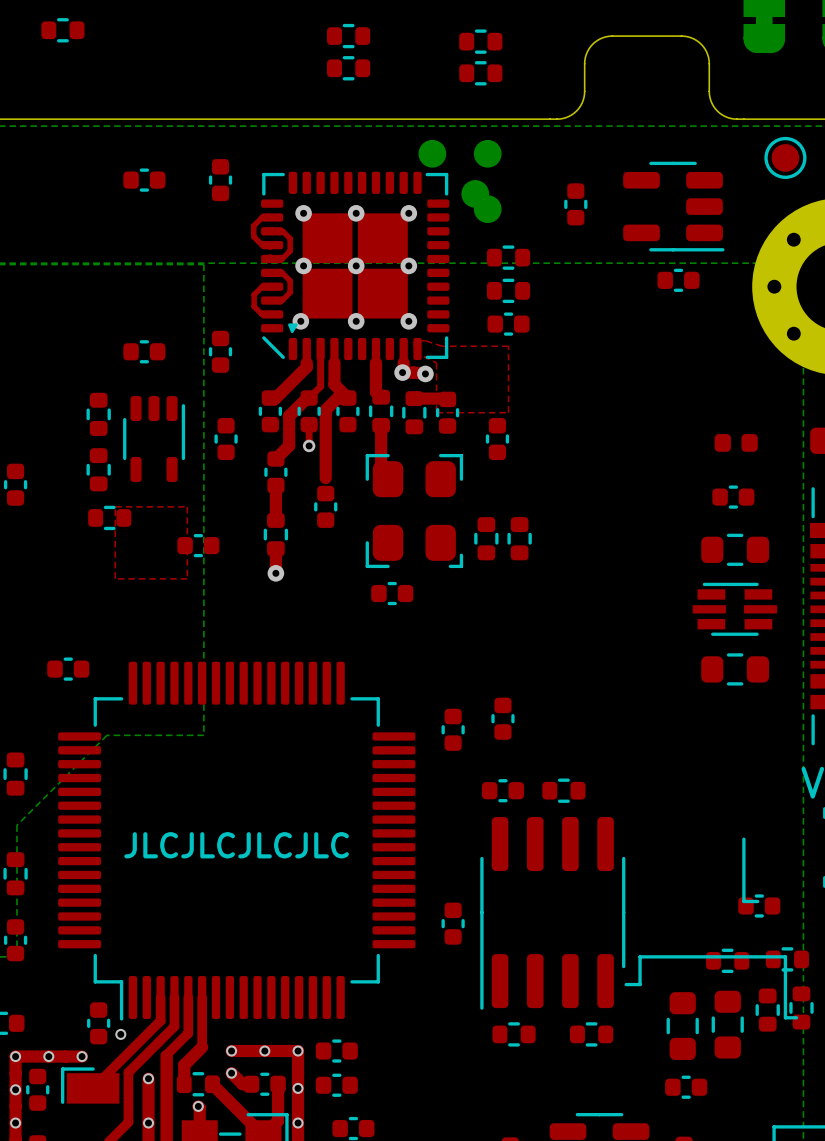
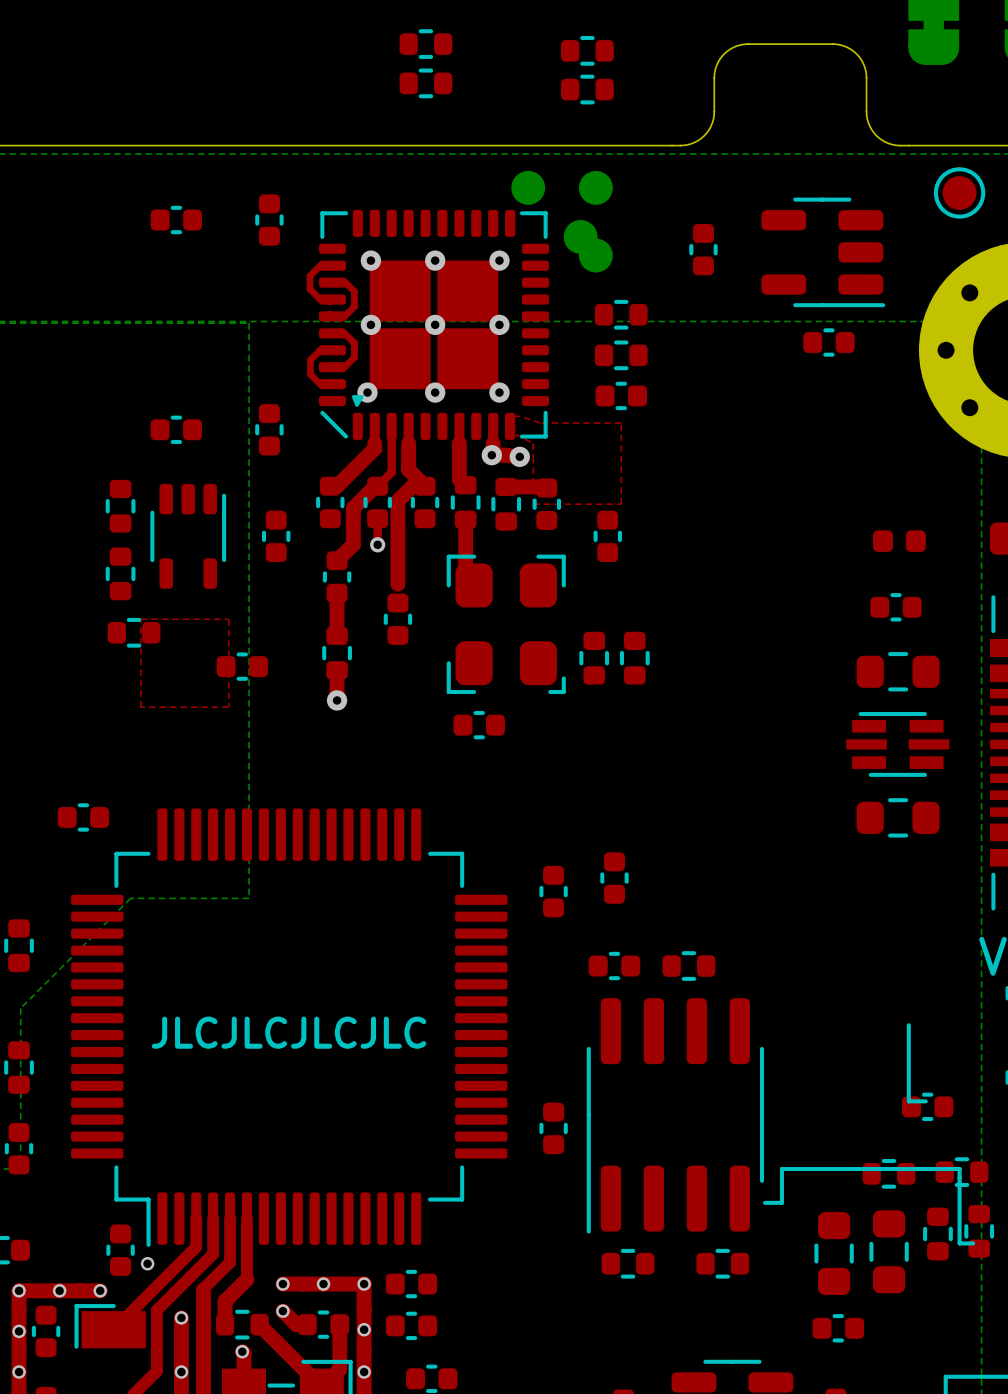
part: (62, 30) -> none
part: (15, 484) -> none

